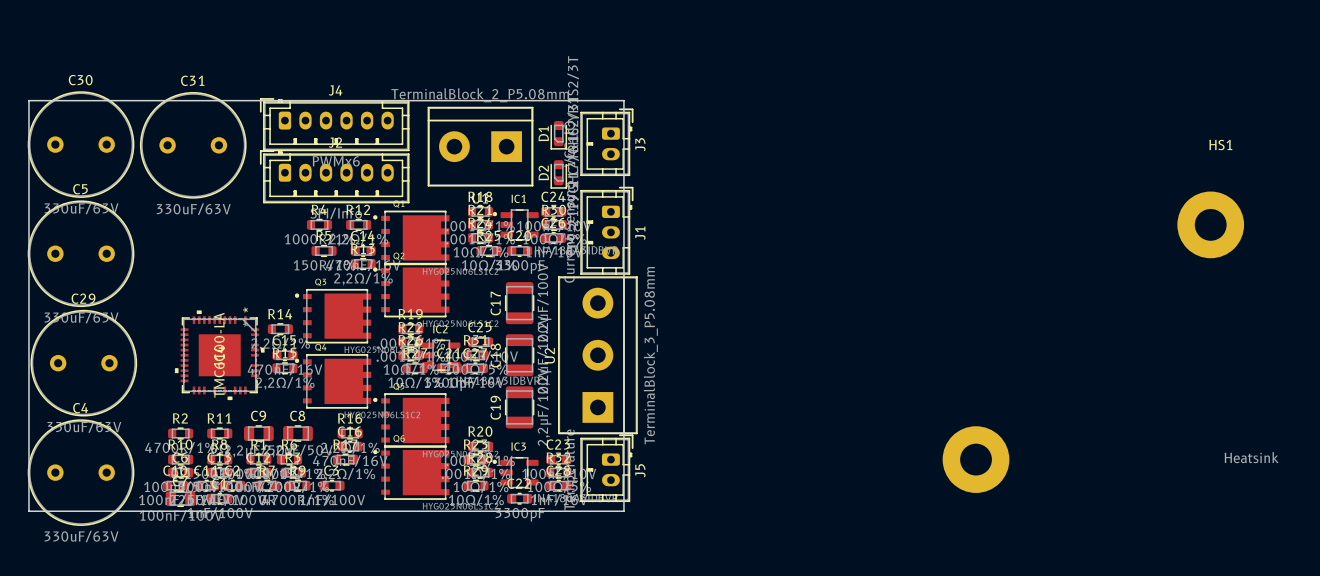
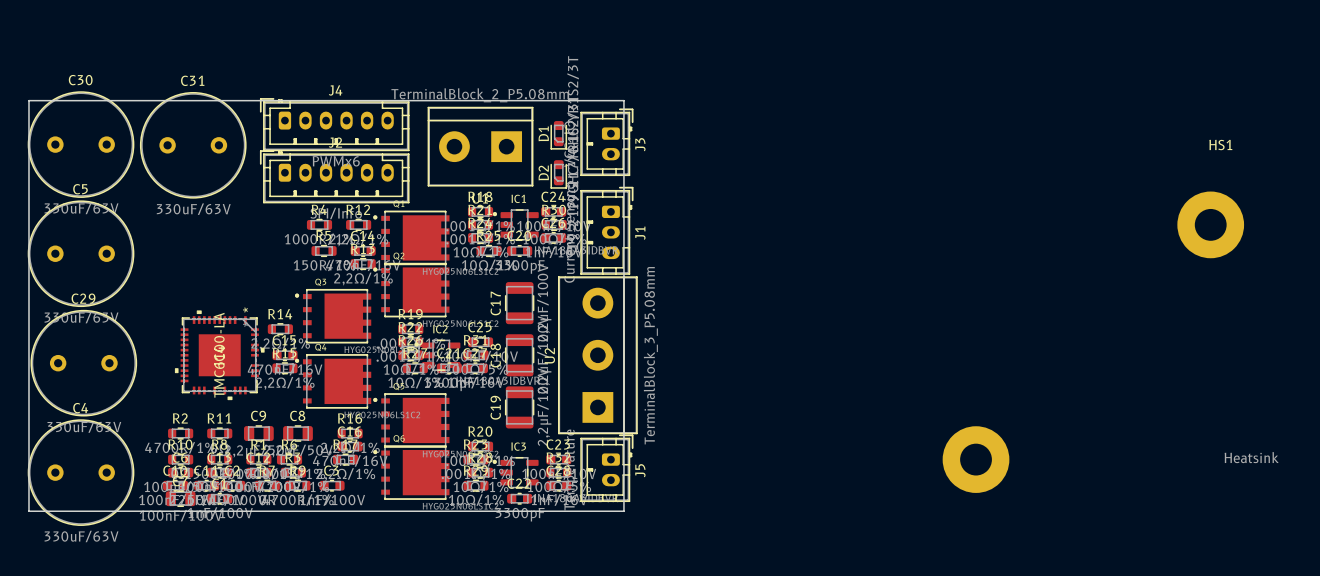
C17 value: 2.2μF/100V (544, 302) -> 2,2μF/100V (544, 302)

